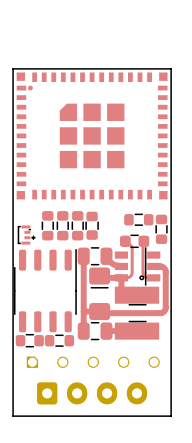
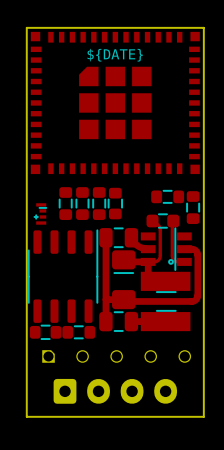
part footprint: [16, 72, 168, 200] -> [30, 31, 200, 175]
part footprint: [17, 225, 36, 245] -> [33, 203, 48, 225]

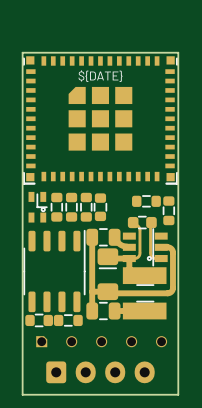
part footprint: [30, 31, 200, 175] -> [22, 56, 179, 185]
part footprint: [33, 203, 48, 225] -> [28, 191, 48, 223]

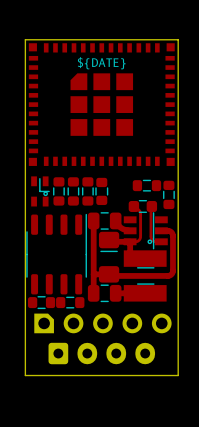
part footprint: [22, 56, 179, 185] -> [28, 43, 175, 166]
part footprint: [36, 336, 168, 348] -> [34, 313, 172, 334]

